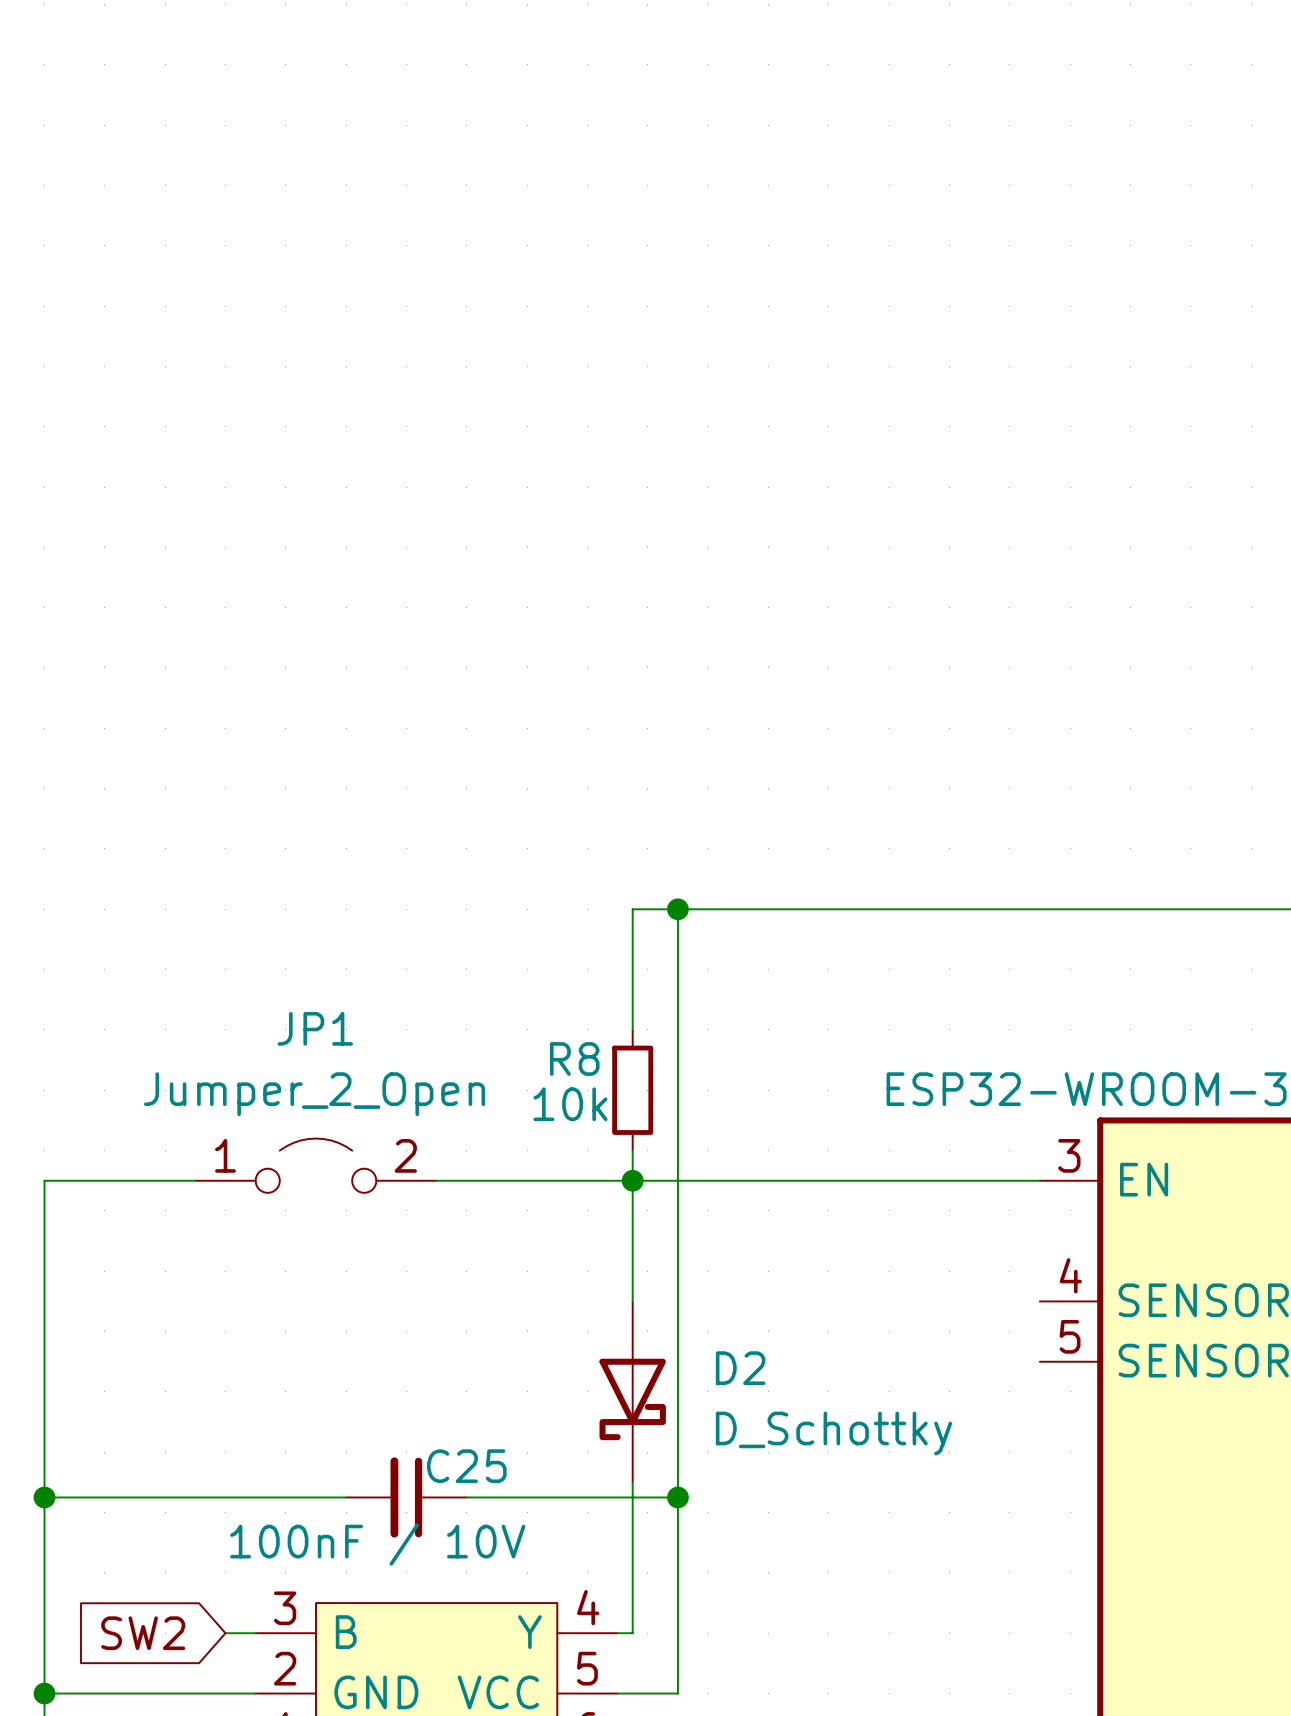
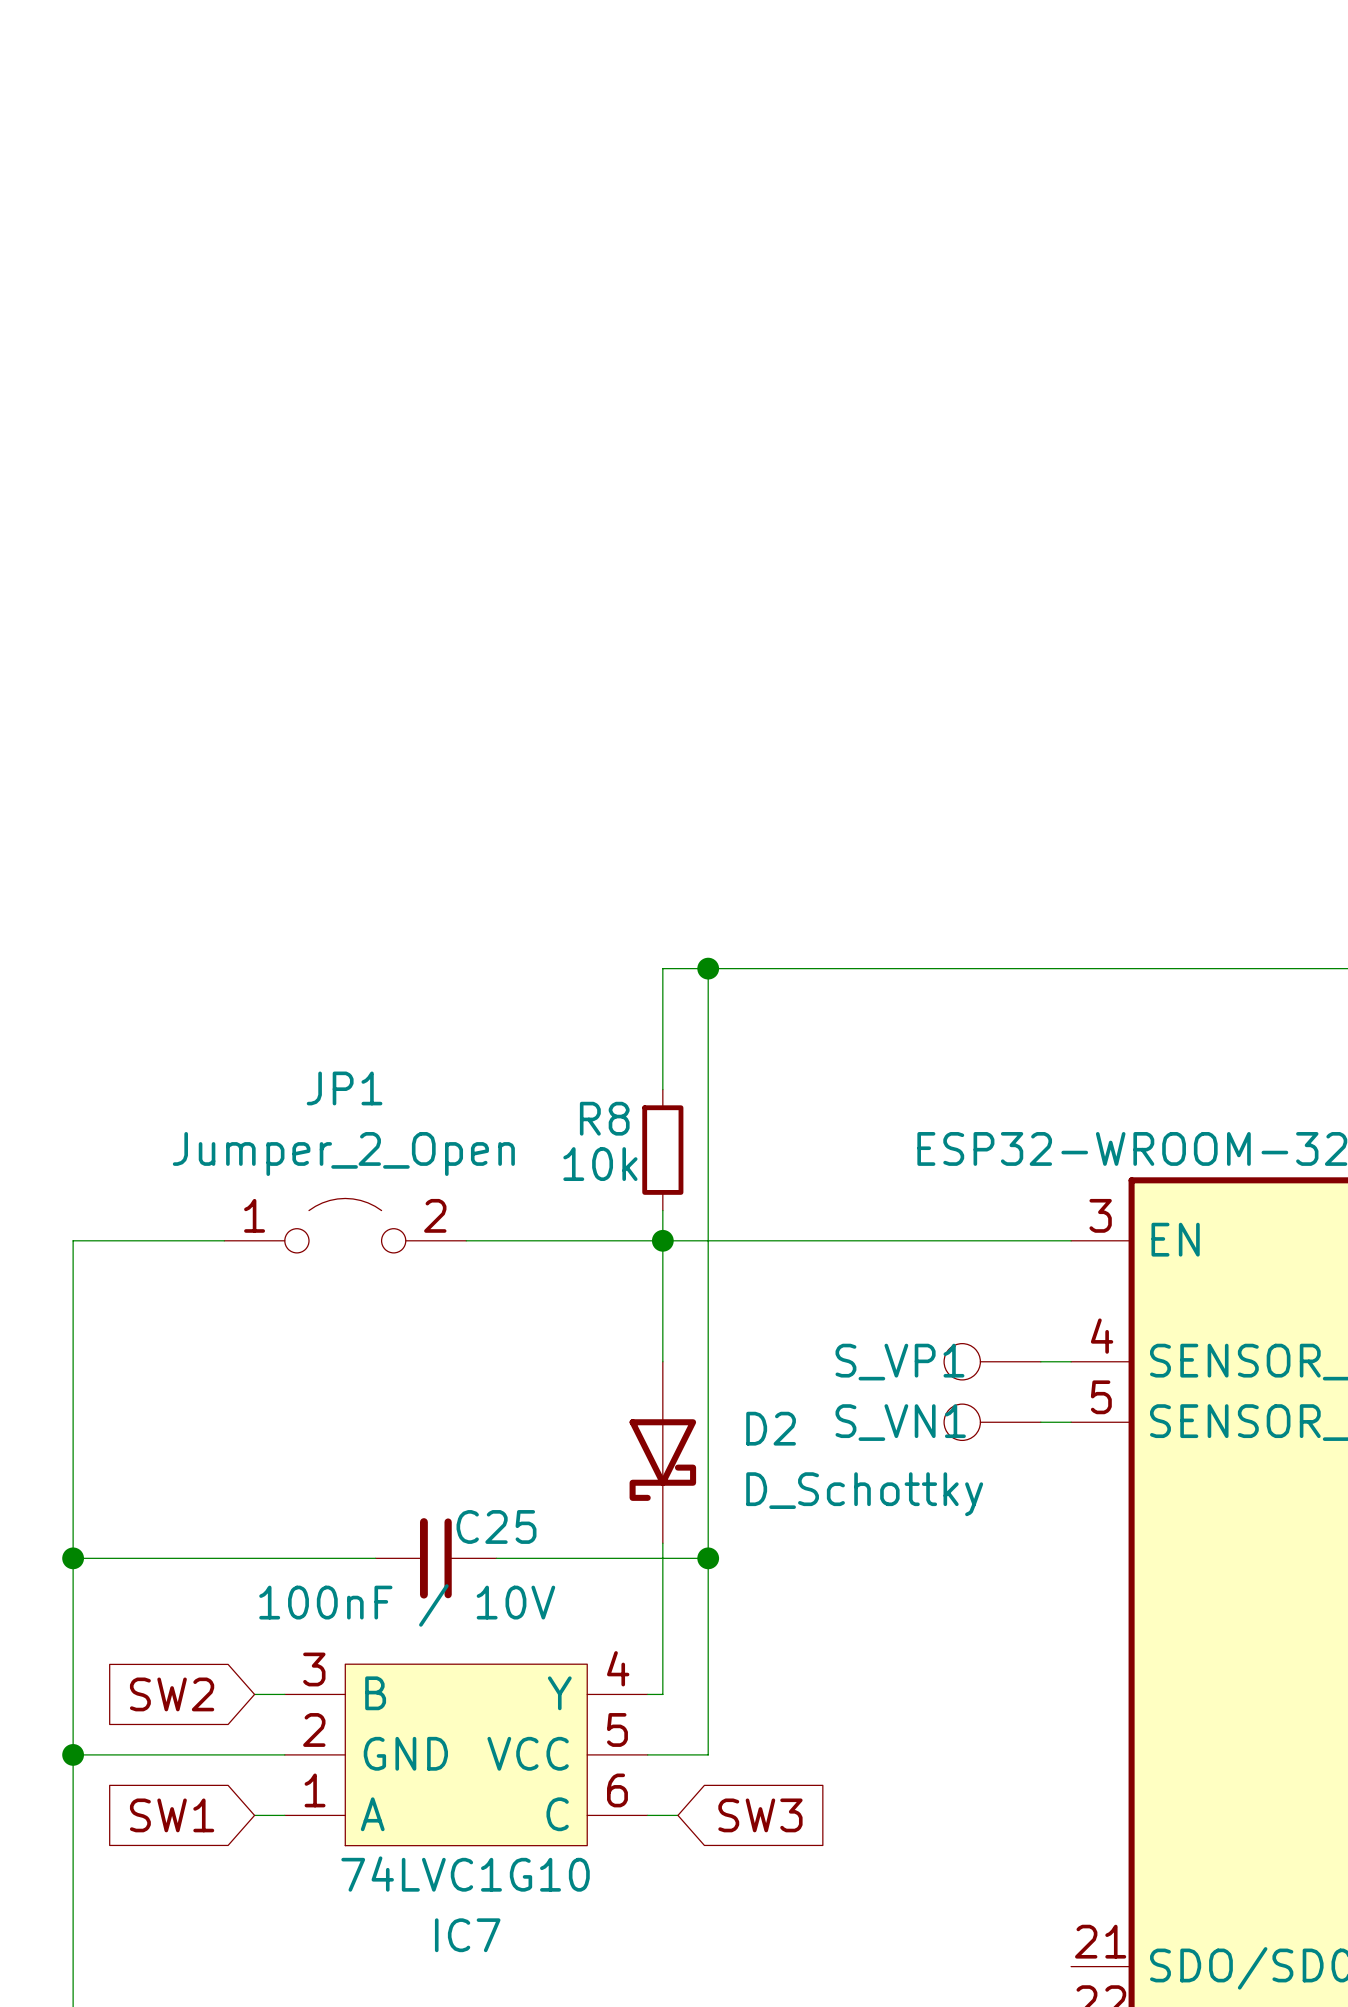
S_VP1: none -> (992, 1361)
wire: none -> (1040, 1361) (1071, 1361)
S_VN1: none -> (992, 1422)
wire: none -> (1040, 1422) (1071, 1422)

